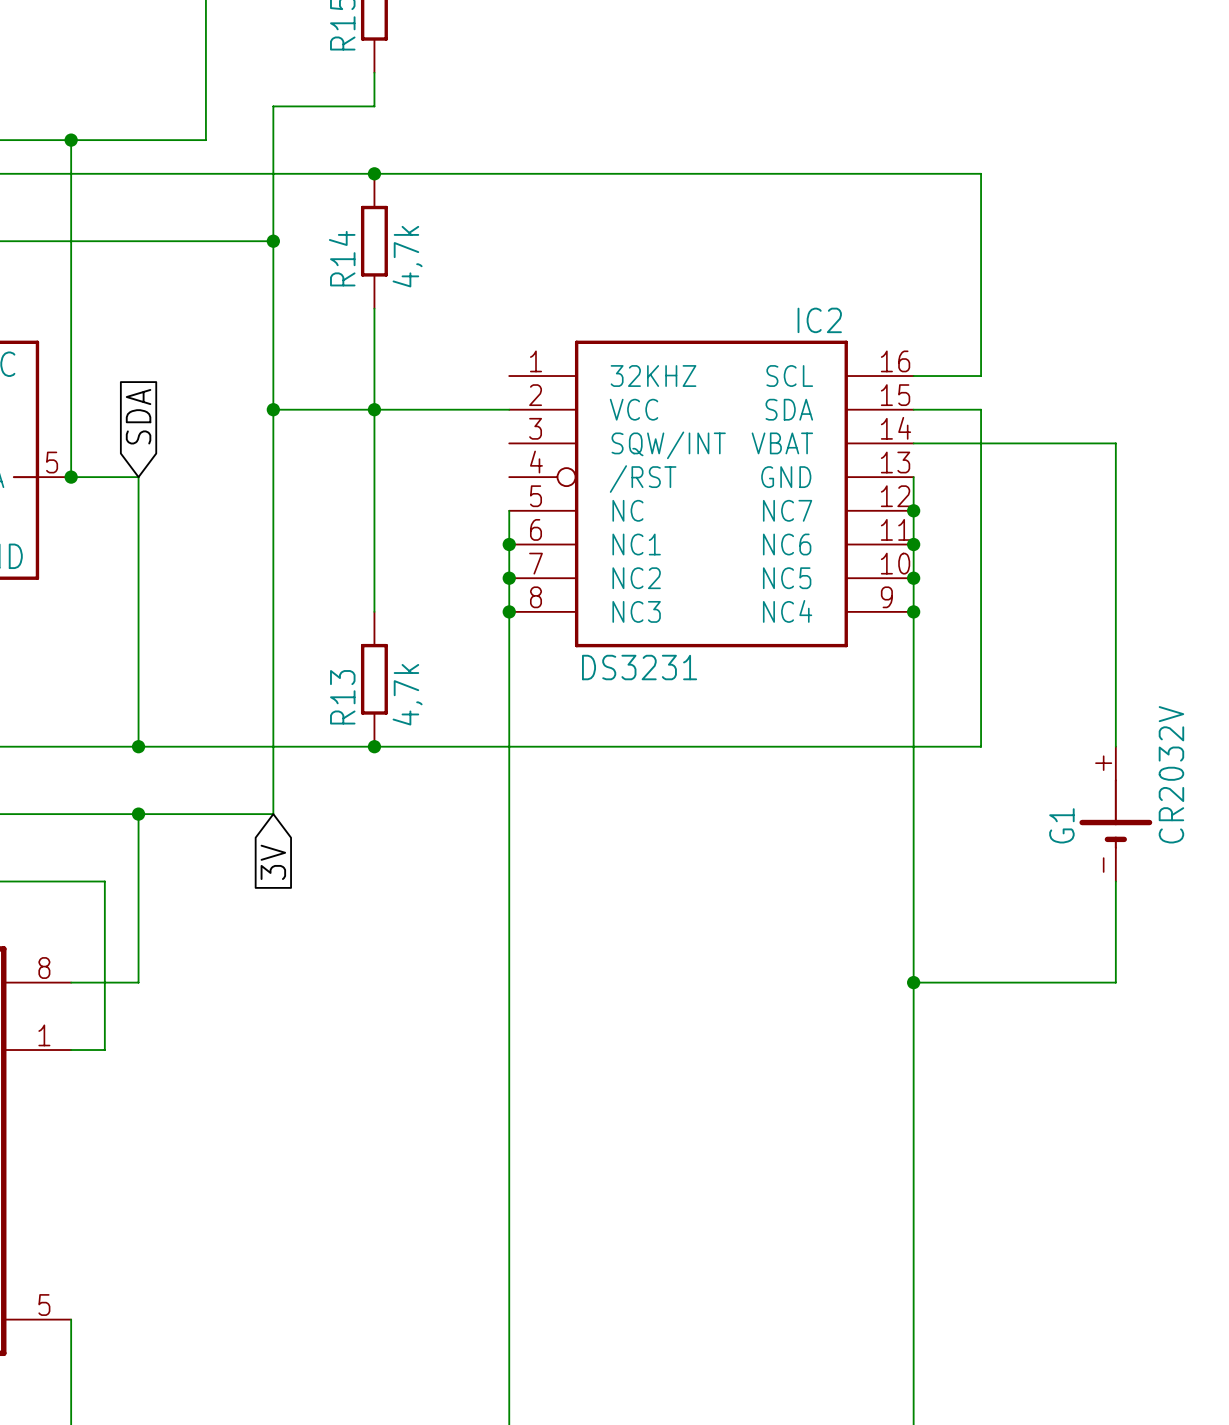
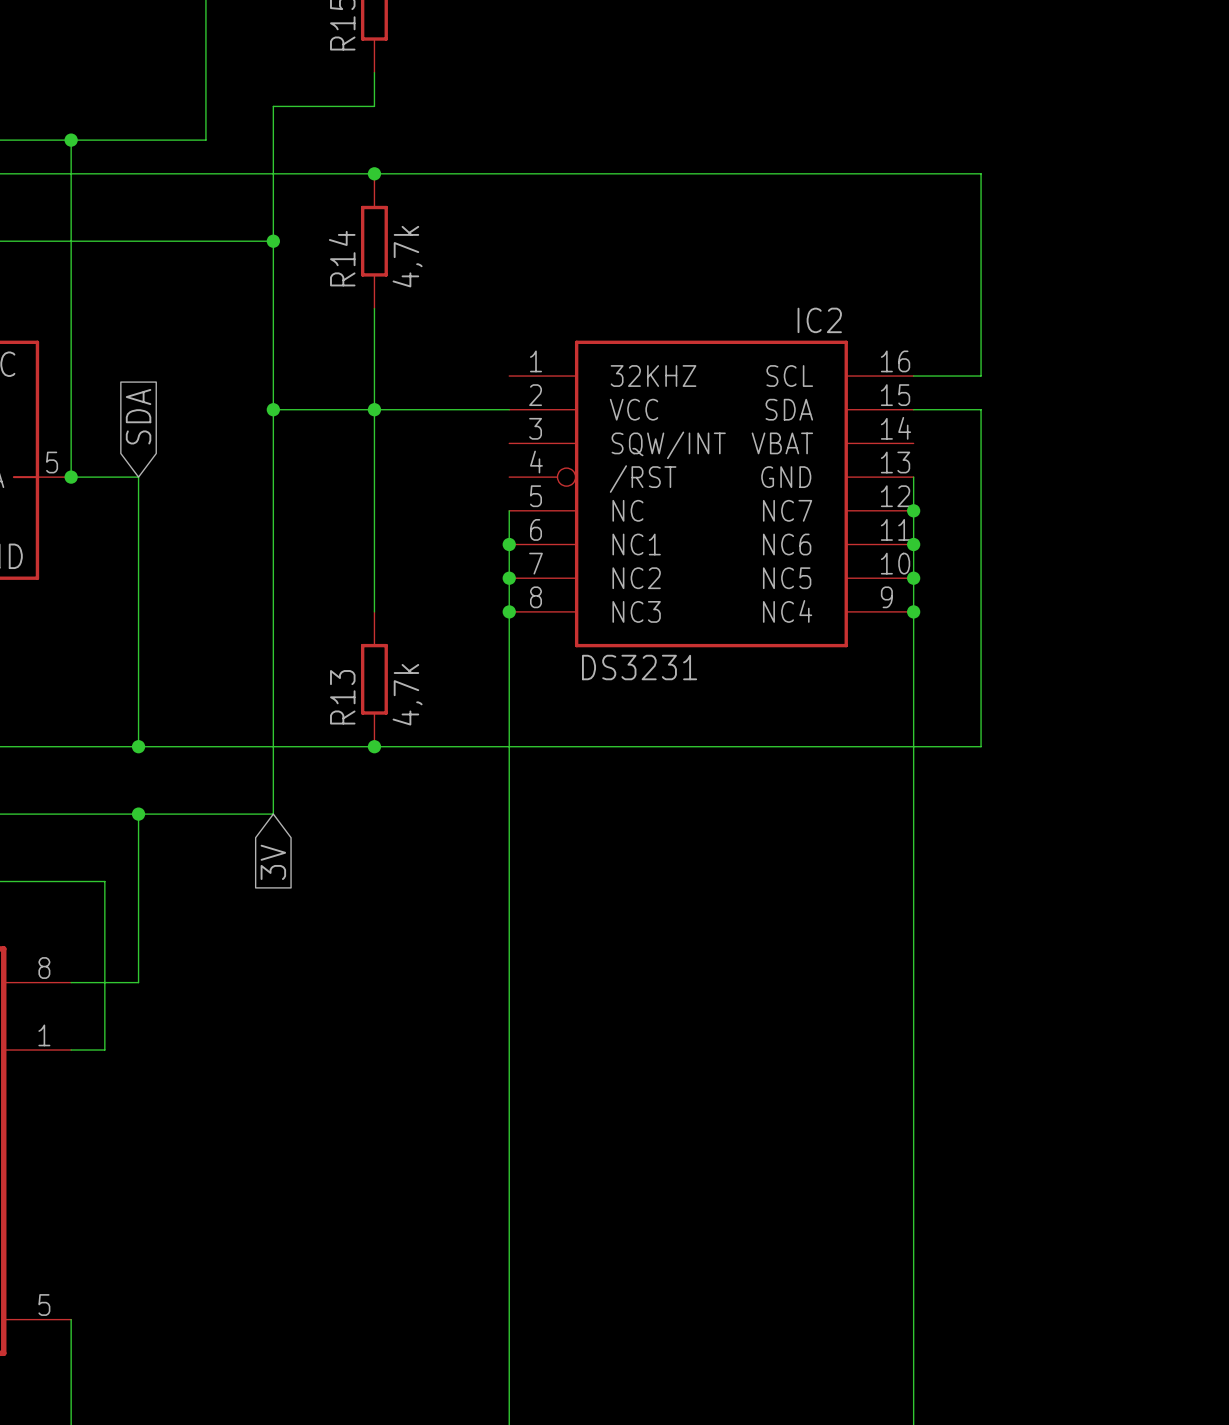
wire: (913, 443) (1115, 443) (1115, 746) -> none
G1: CR2032V (1115, 814) -> none
wire: (1115, 881) (1115, 982) (913, 982) -> none
junction: (913, 982) -> none

